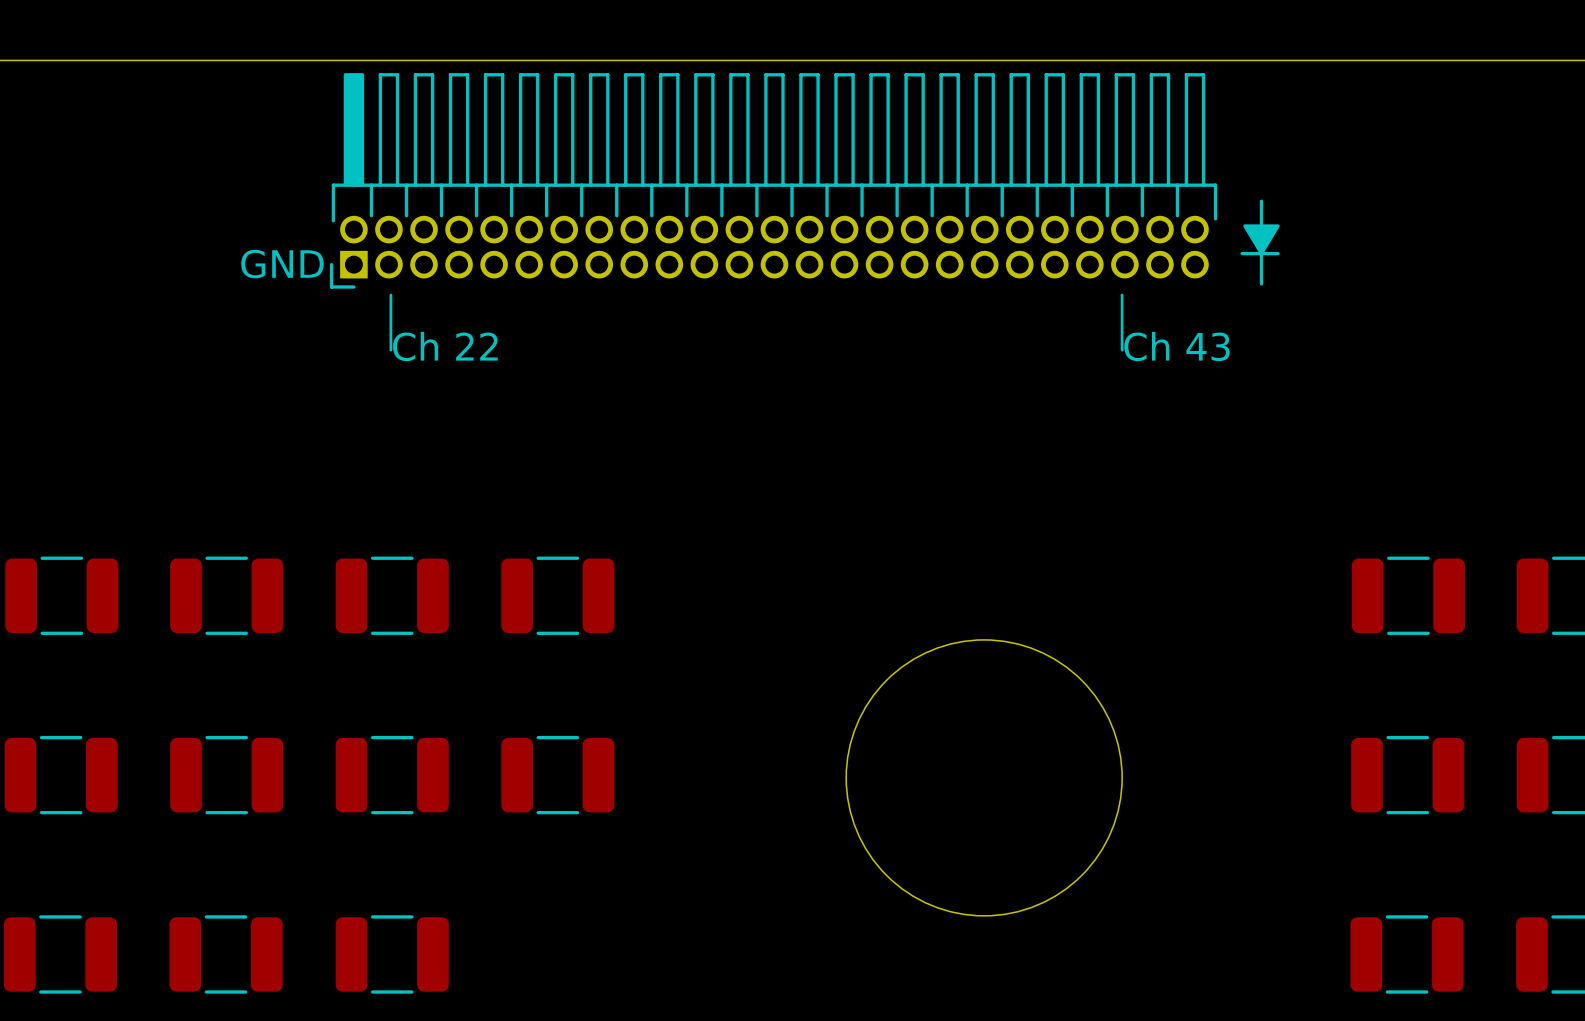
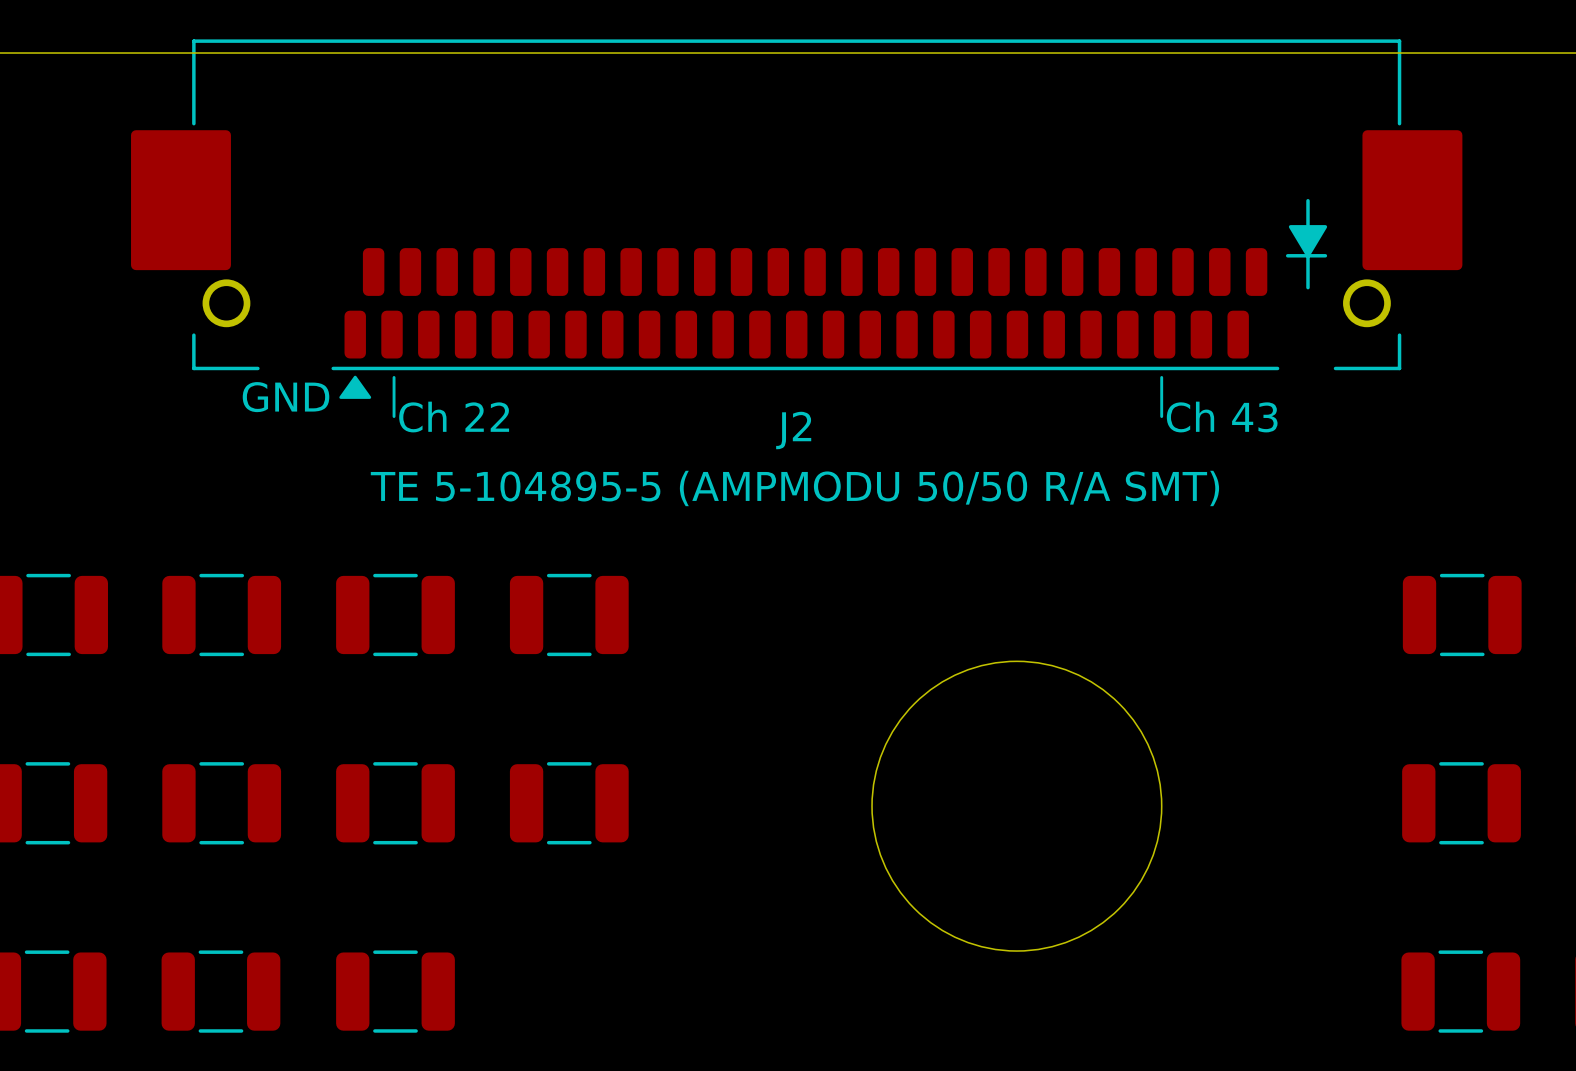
part: (773, 180) -> none
J2: none -> (796, 219)
text position: GND (282, 264) -> GND (286, 397)
line: (390, 294) (390, 350) -> none
line: (1122, 294) (1122, 350) -> none
text position: Ch 22 (445, 346) -> Ch 22 (454, 417)
text position: Ch 43 (1176, 346) -> Ch 43 (1222, 417)
line: none -> (394, 377) (394, 416)
line: none -> (1161, 377) (1161, 416)
text: none -> TE 5-104895-5 (AMPMODU 50/50 R/A SMT) (794, 488)

